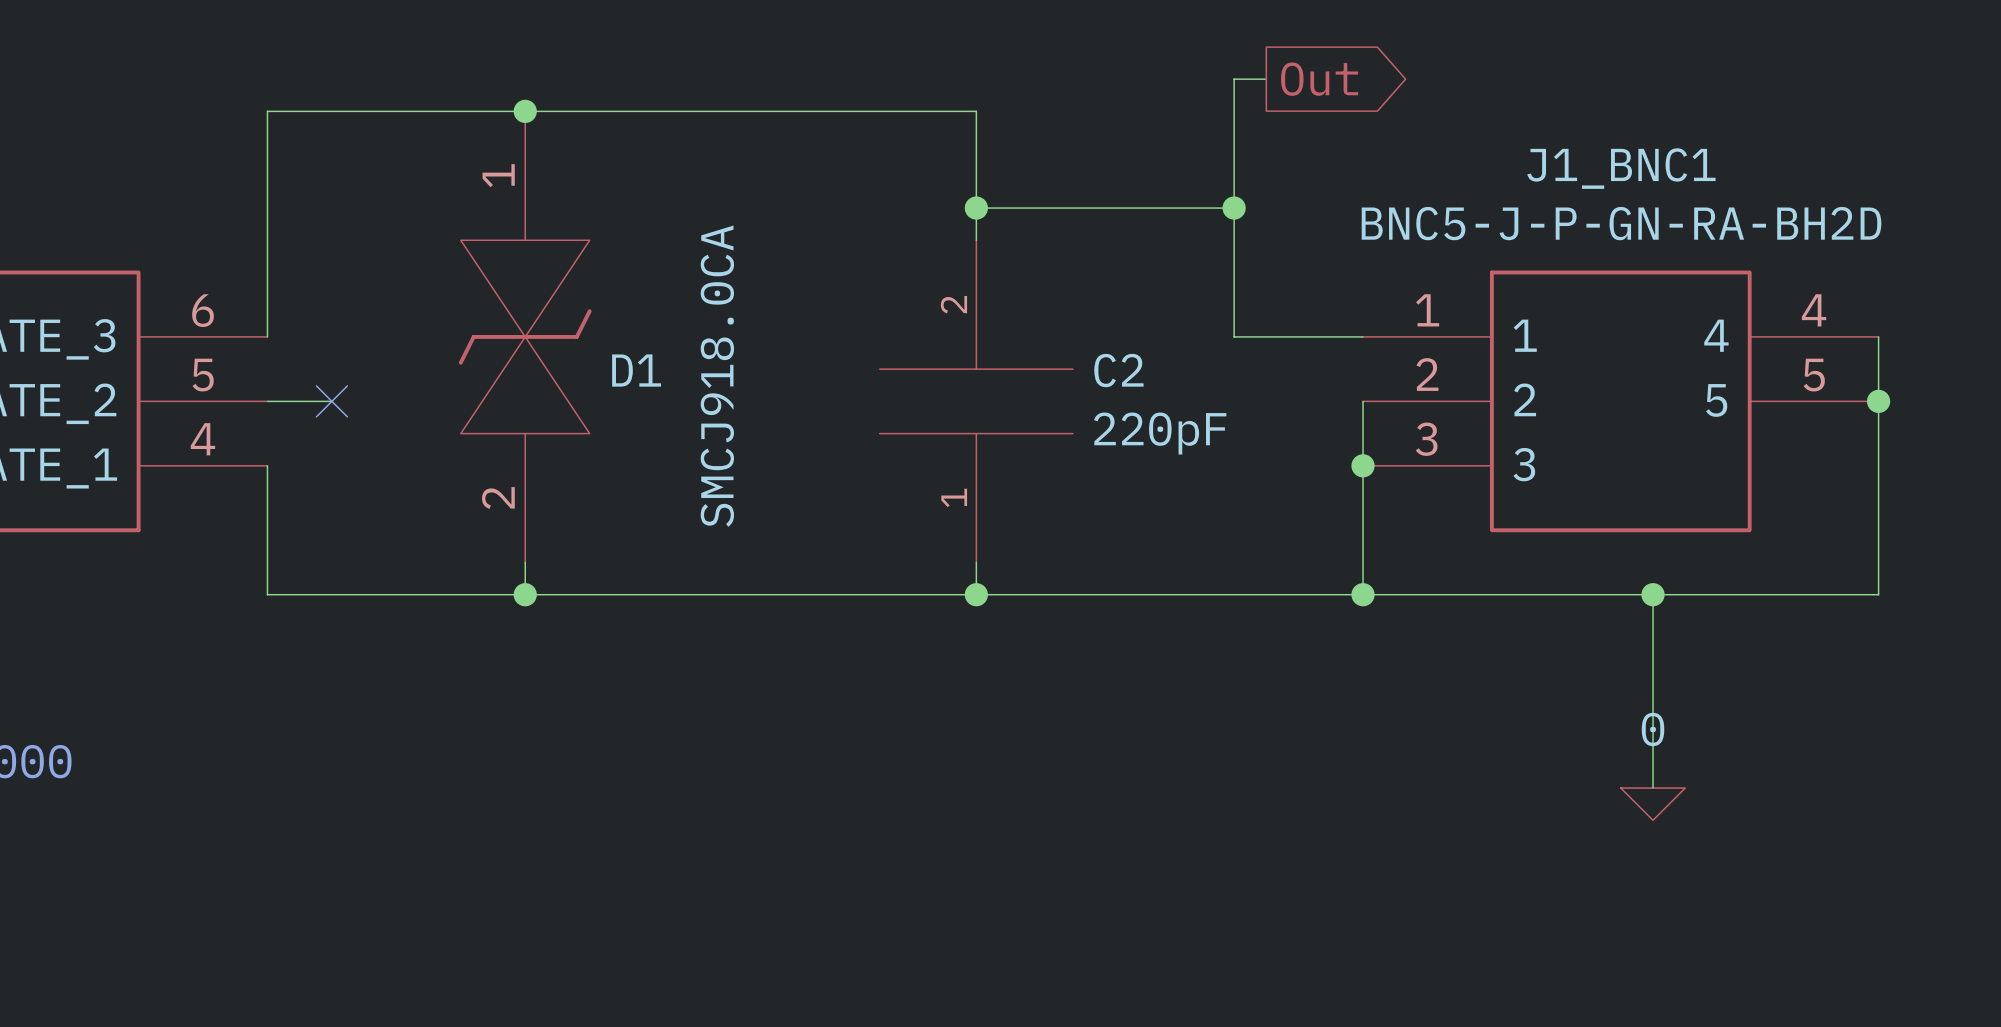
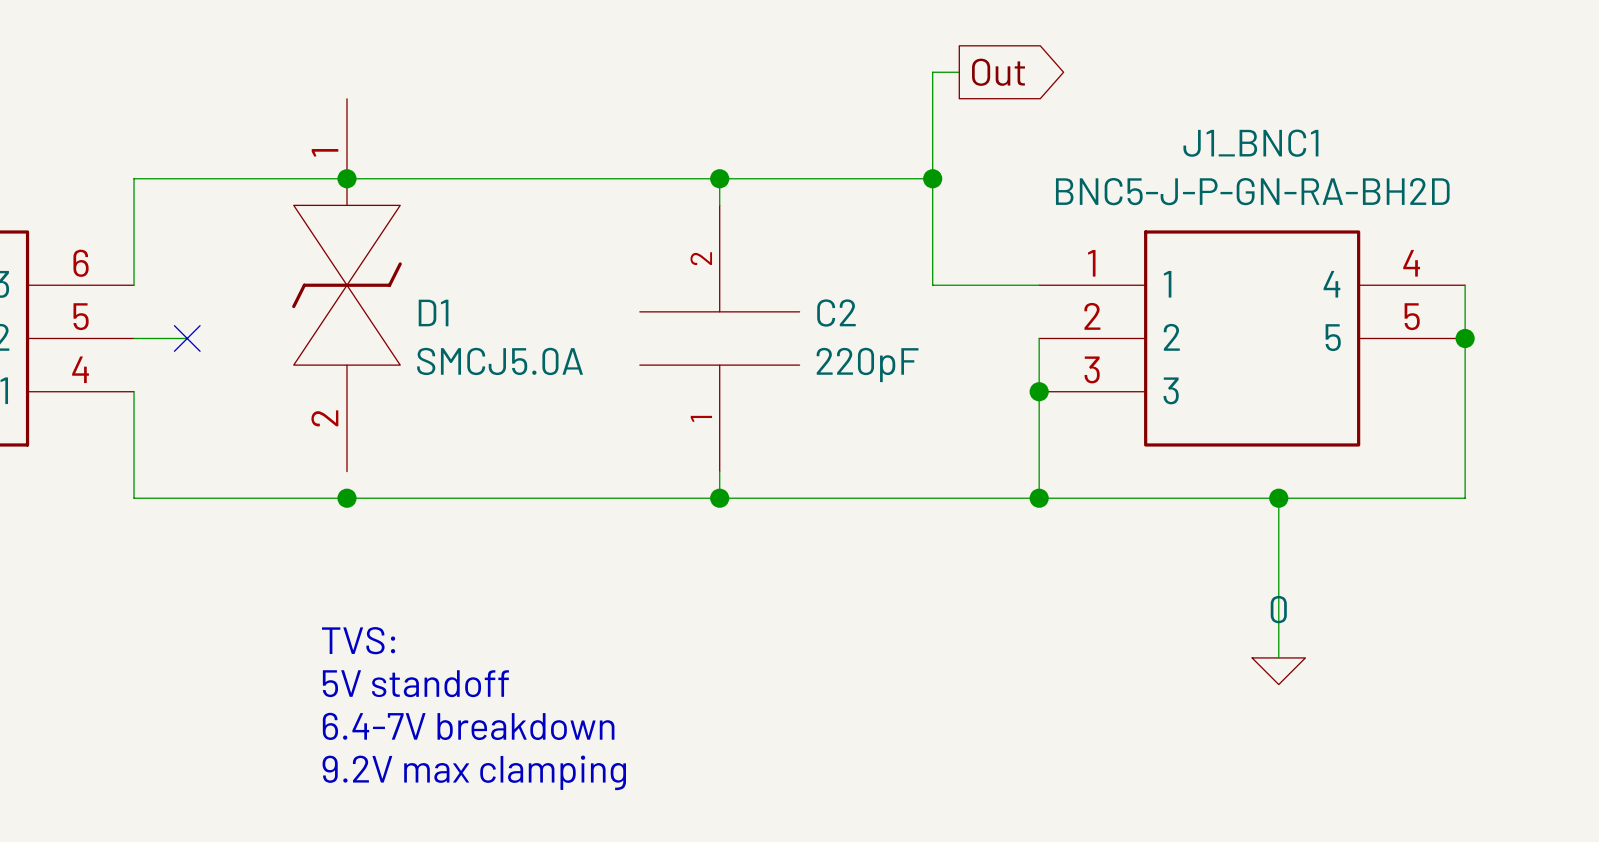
junction position: (525, 111) -> (346, 178)
wire: (267, 208) (267, 111) (976, 111) (976, 208) -> (134, 178) (719, 178)
D1 value: SMCJ918.0CA (717, 376) -> SMCJ5.0A (500, 361)
wire: (525, 562) (525, 594) -> none
text: none -> TVS: (358, 640)
text: none -> 5V standoff (415, 683)
text: none -> 6.4-7V breakdown (468, 726)
text: none -> 9.2V max clamping (474, 772)

